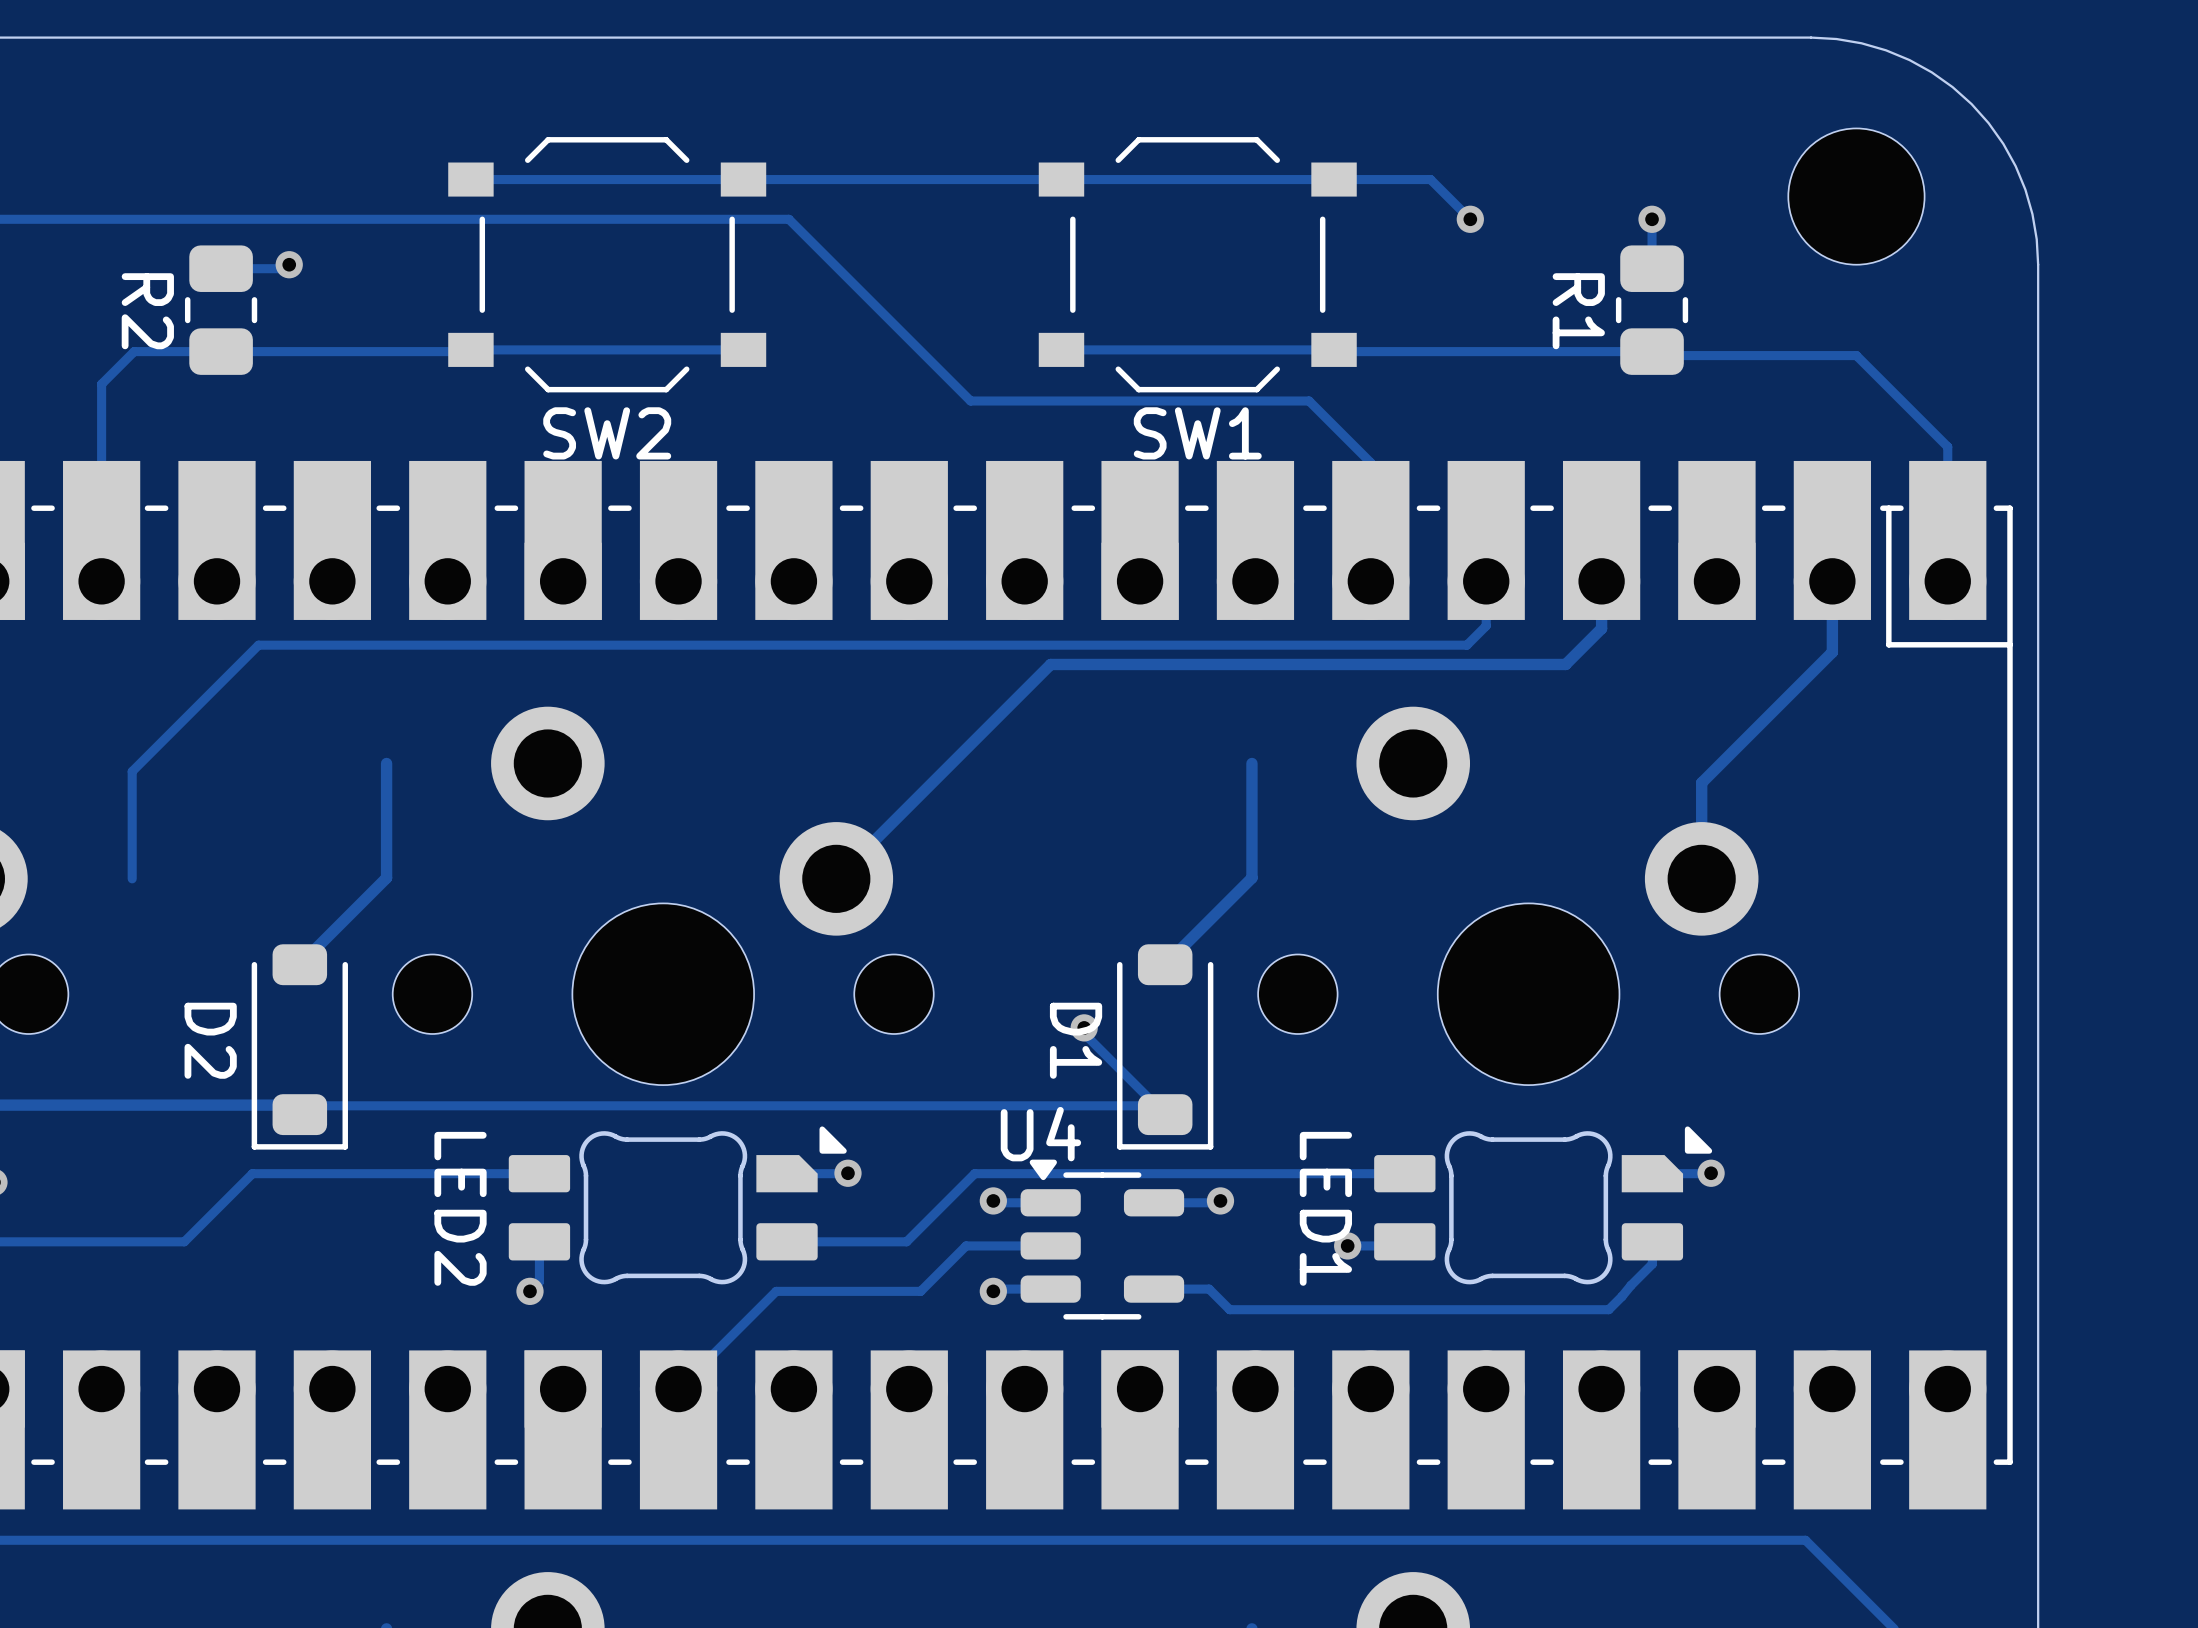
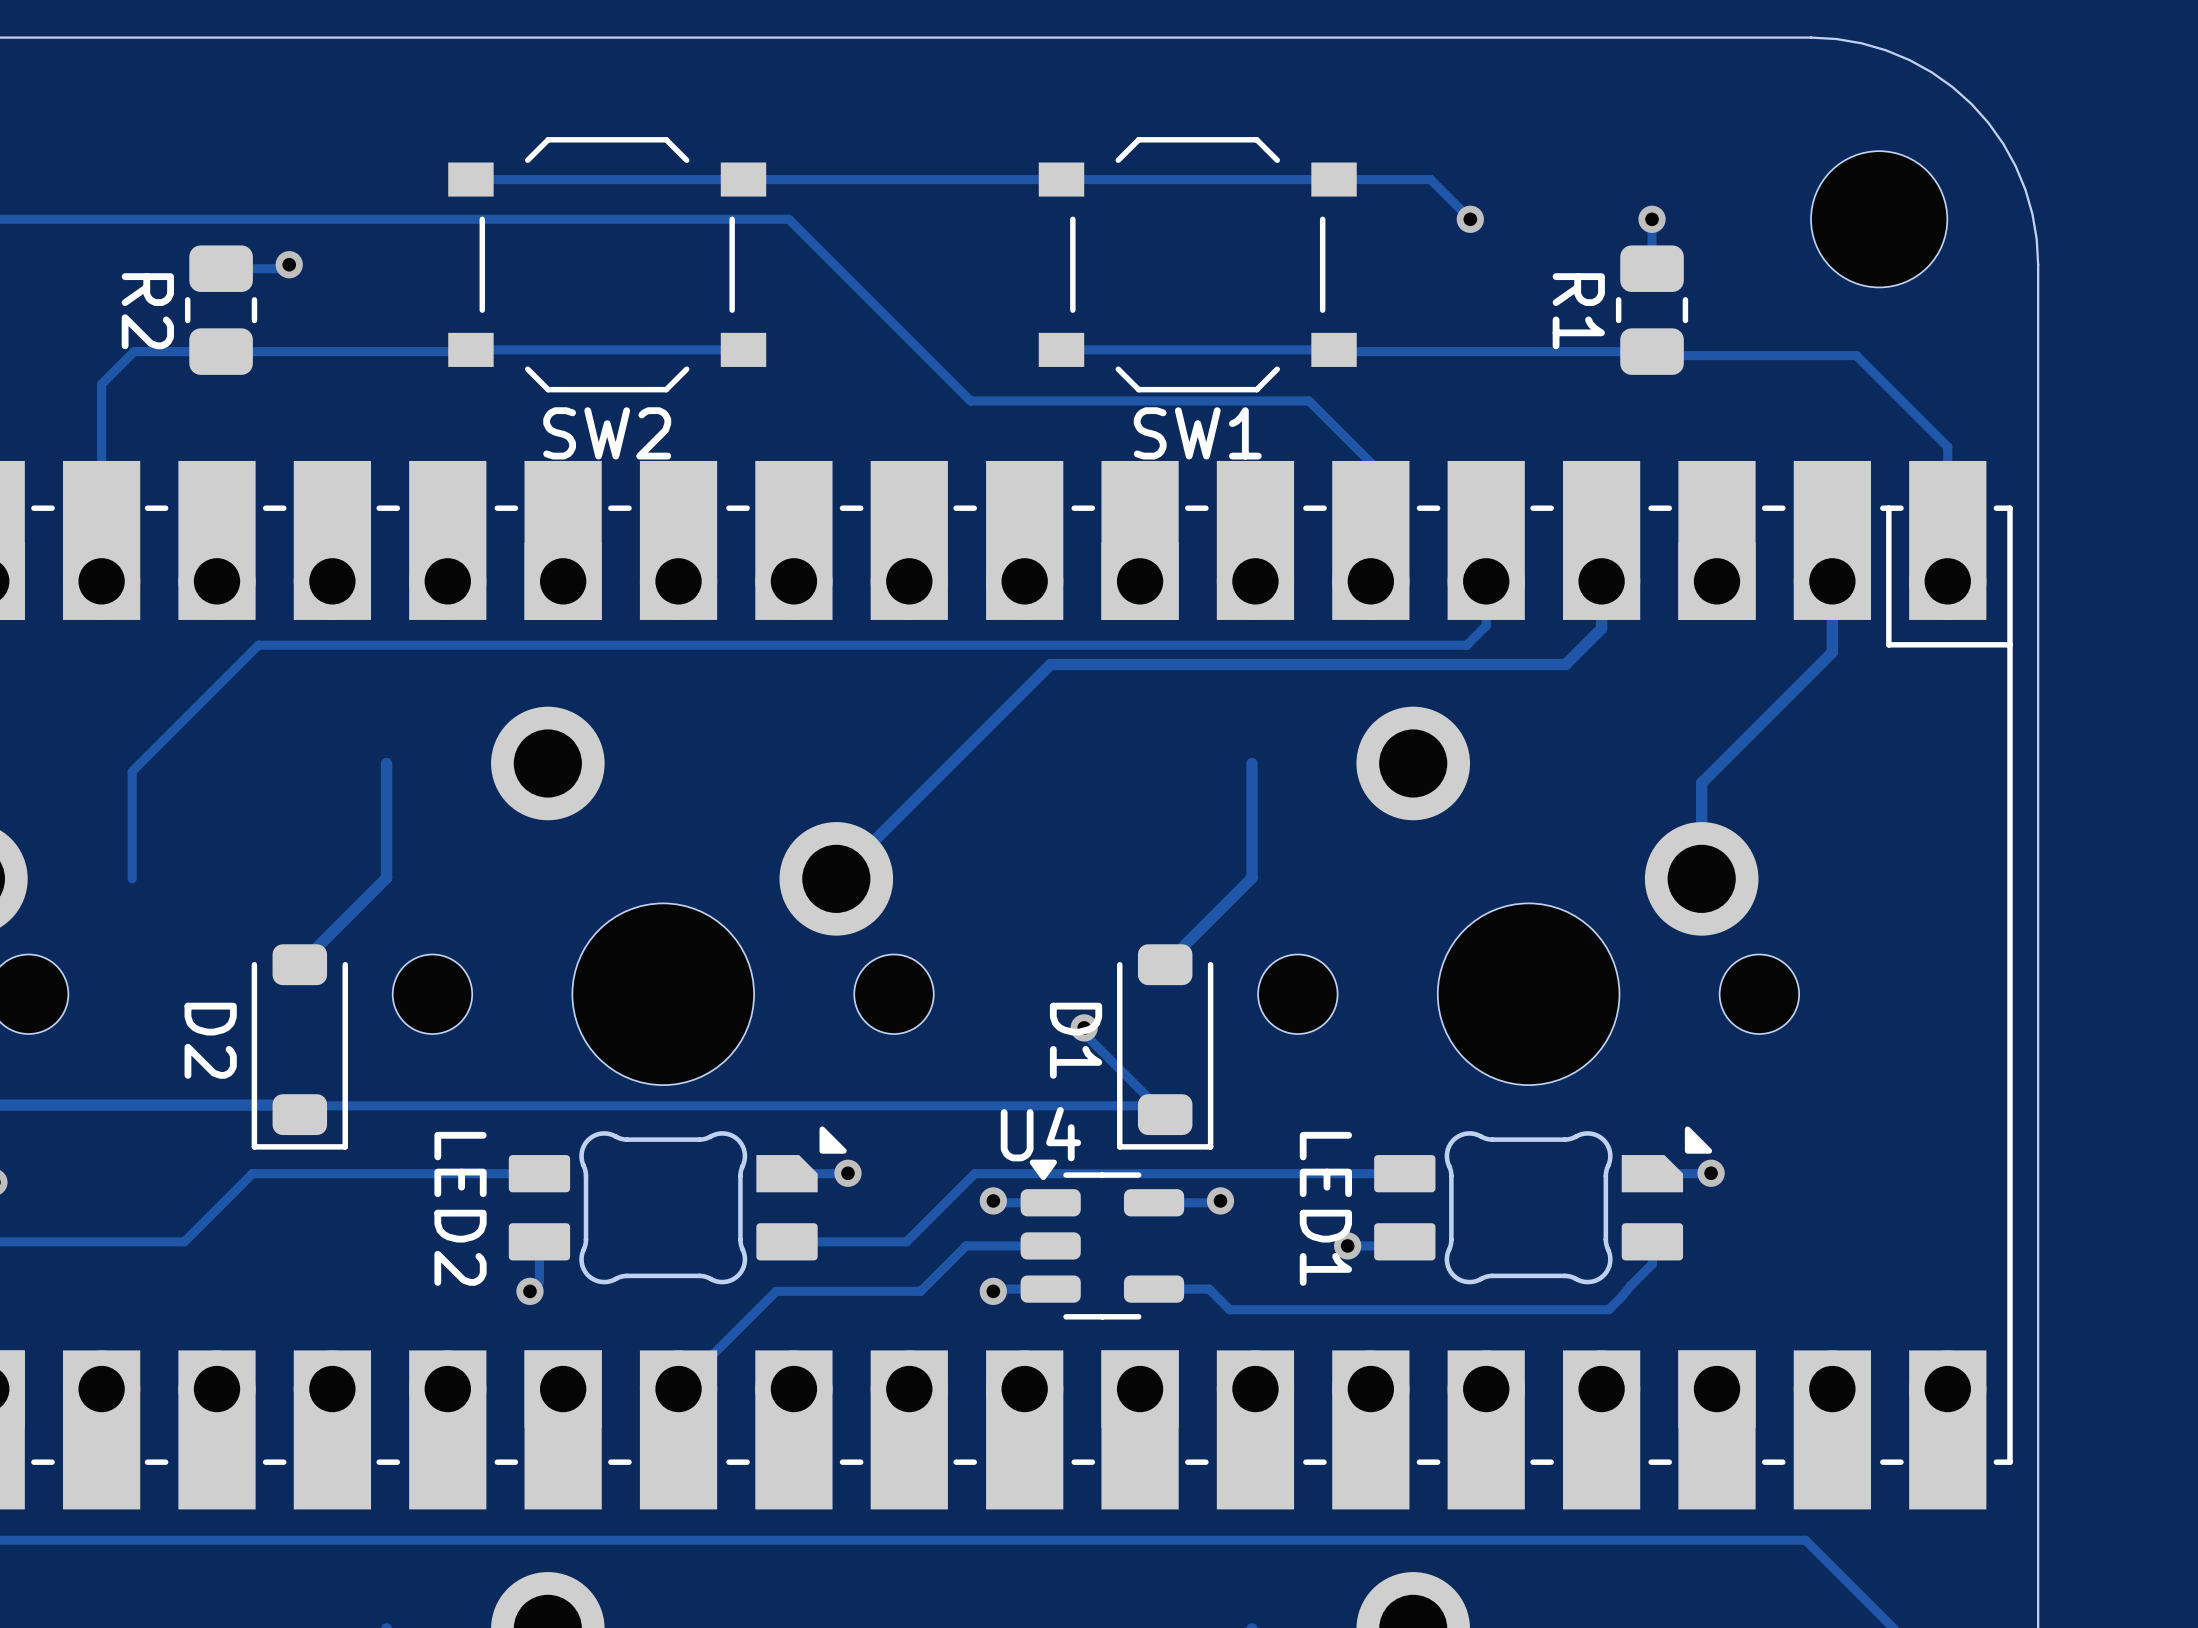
part position: (1856, 196) -> (1879, 219)

